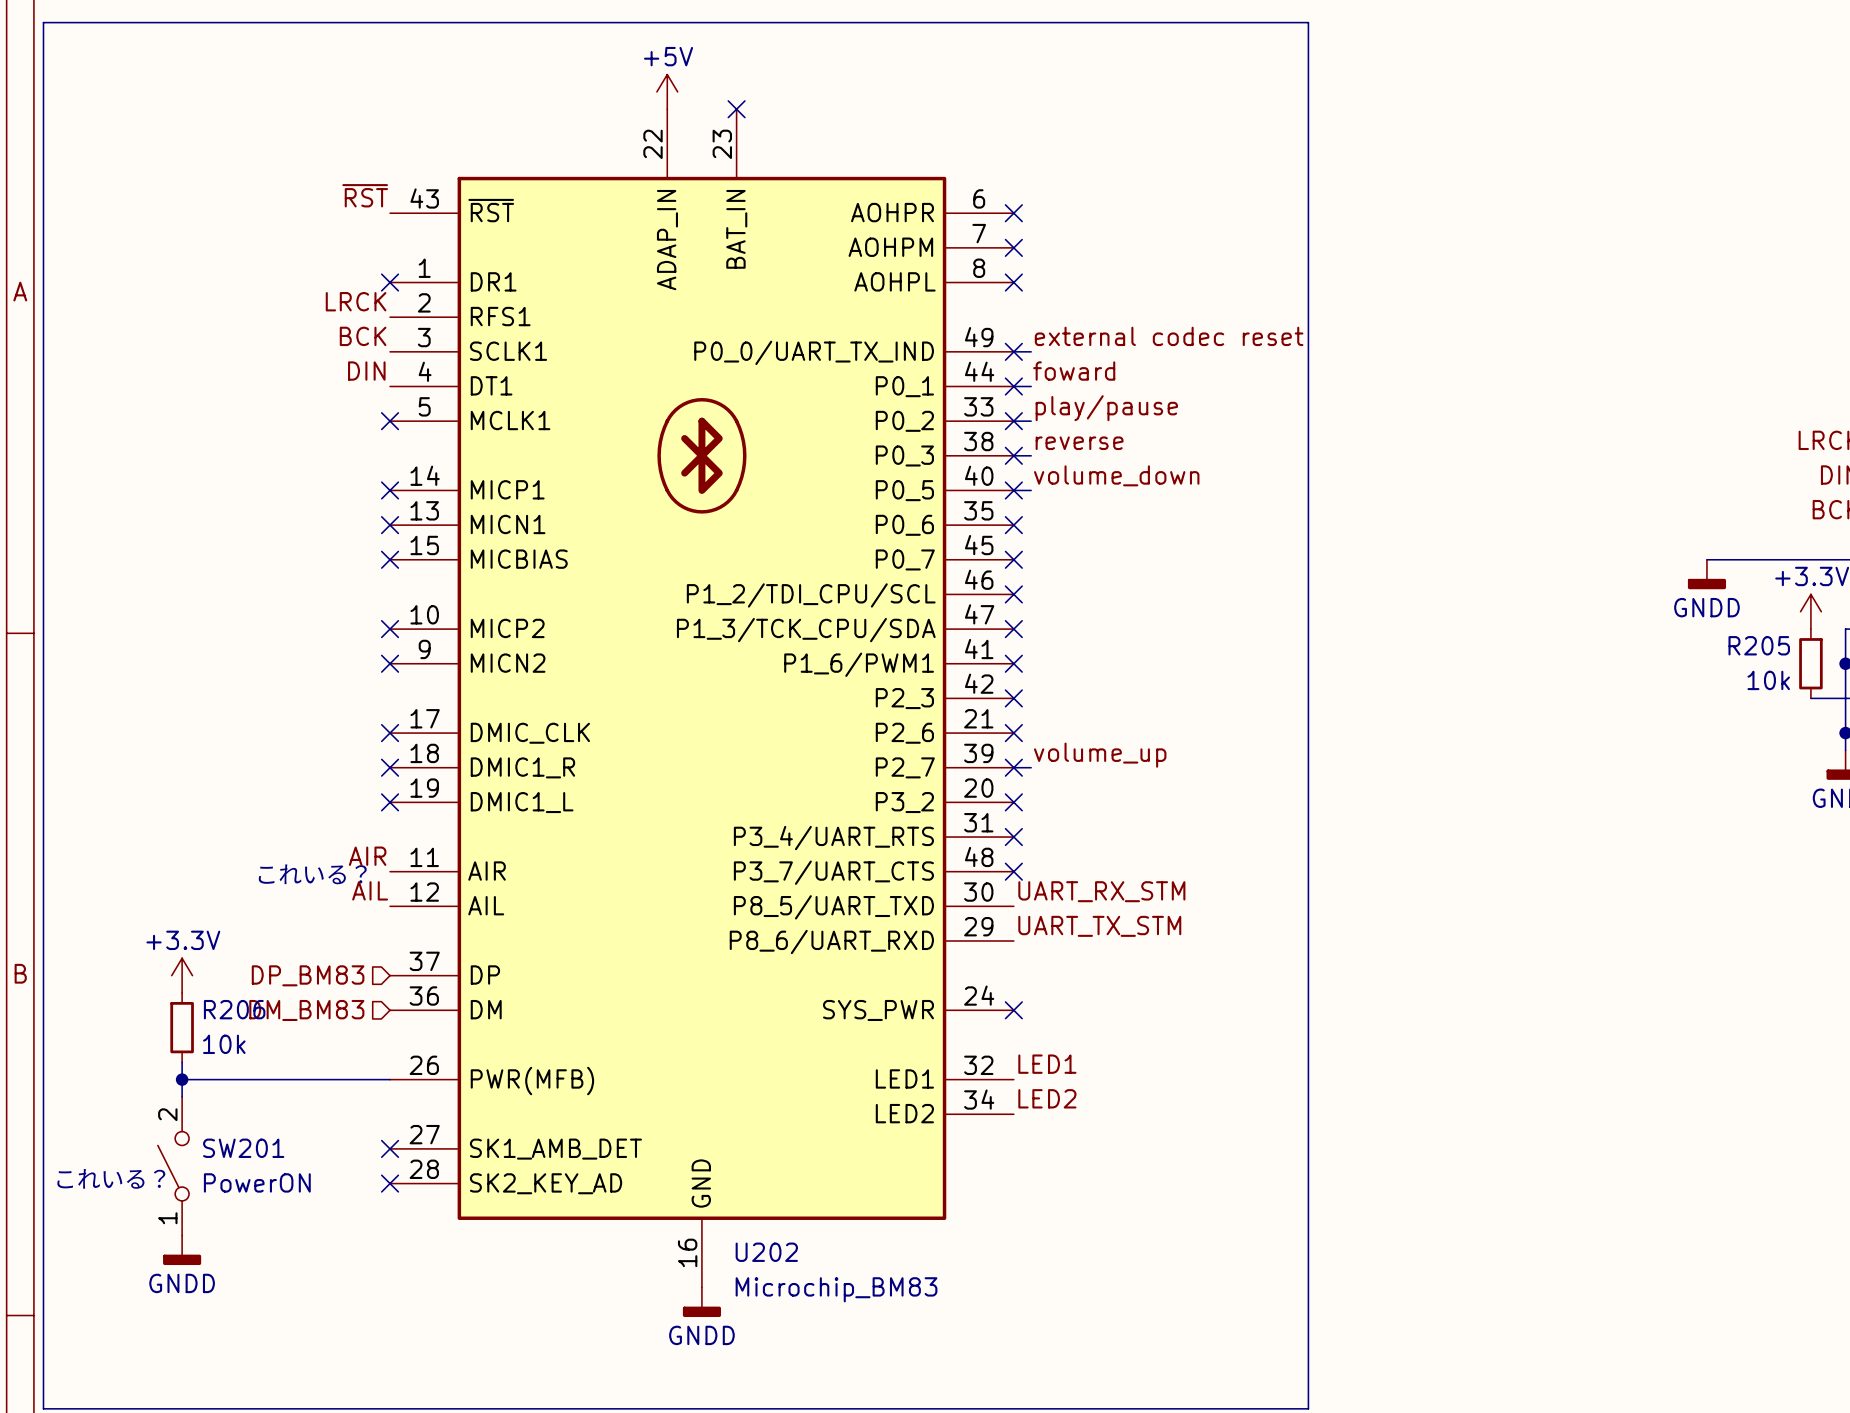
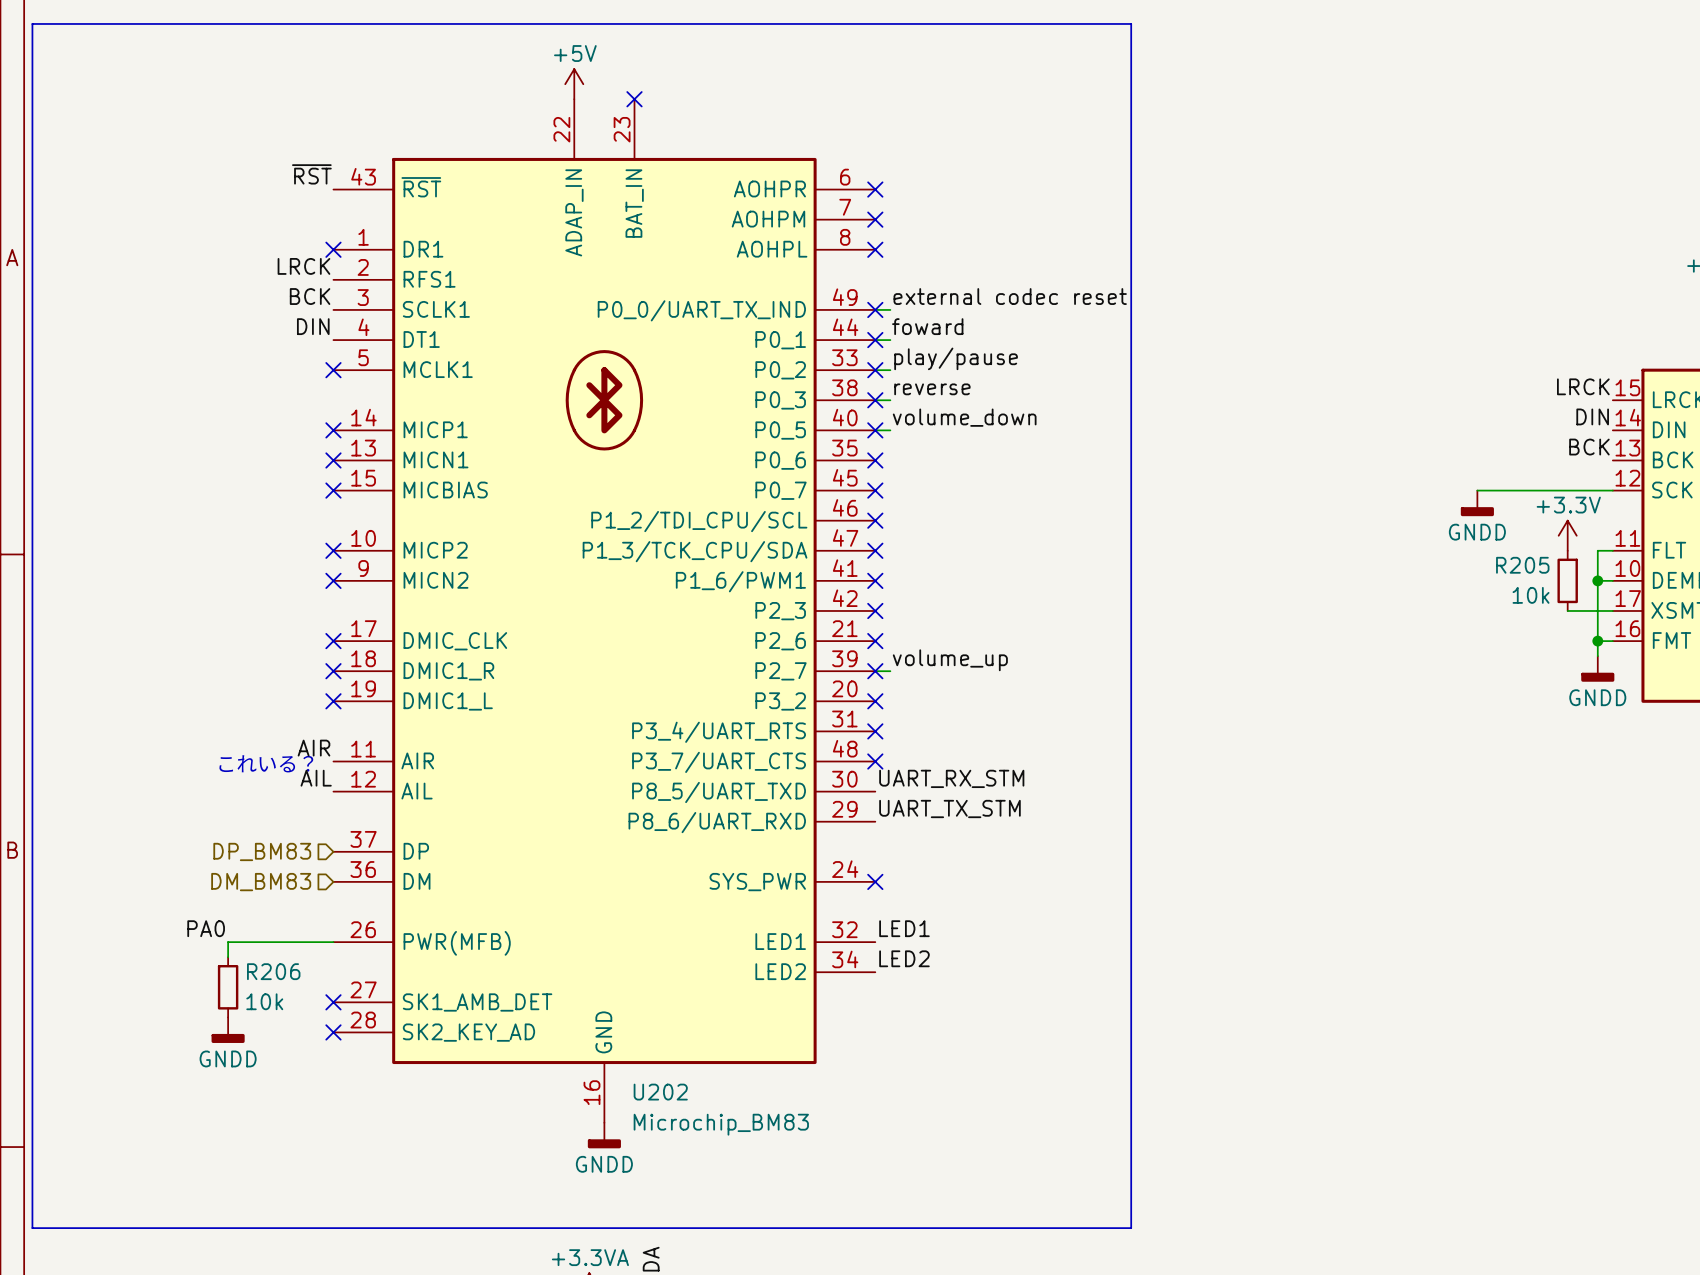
power symbol: +3.3V (182, 975) -> none
R206 position: (182, 1027) -> (228, 987)
wire: (182, 1062) (182, 1096) -> none
label: none -> PA0 (206, 928)
wire: (182, 1079) (268, 1079) -> (228, 957) (228, 942)
junction: (182, 1079) -> none
SW201: PowerON (173, 1166) -> none
text: これいる？ (111, 1178) -> none
power symbol position: GNDD (182, 1250) -> GNDD (228, 1030)

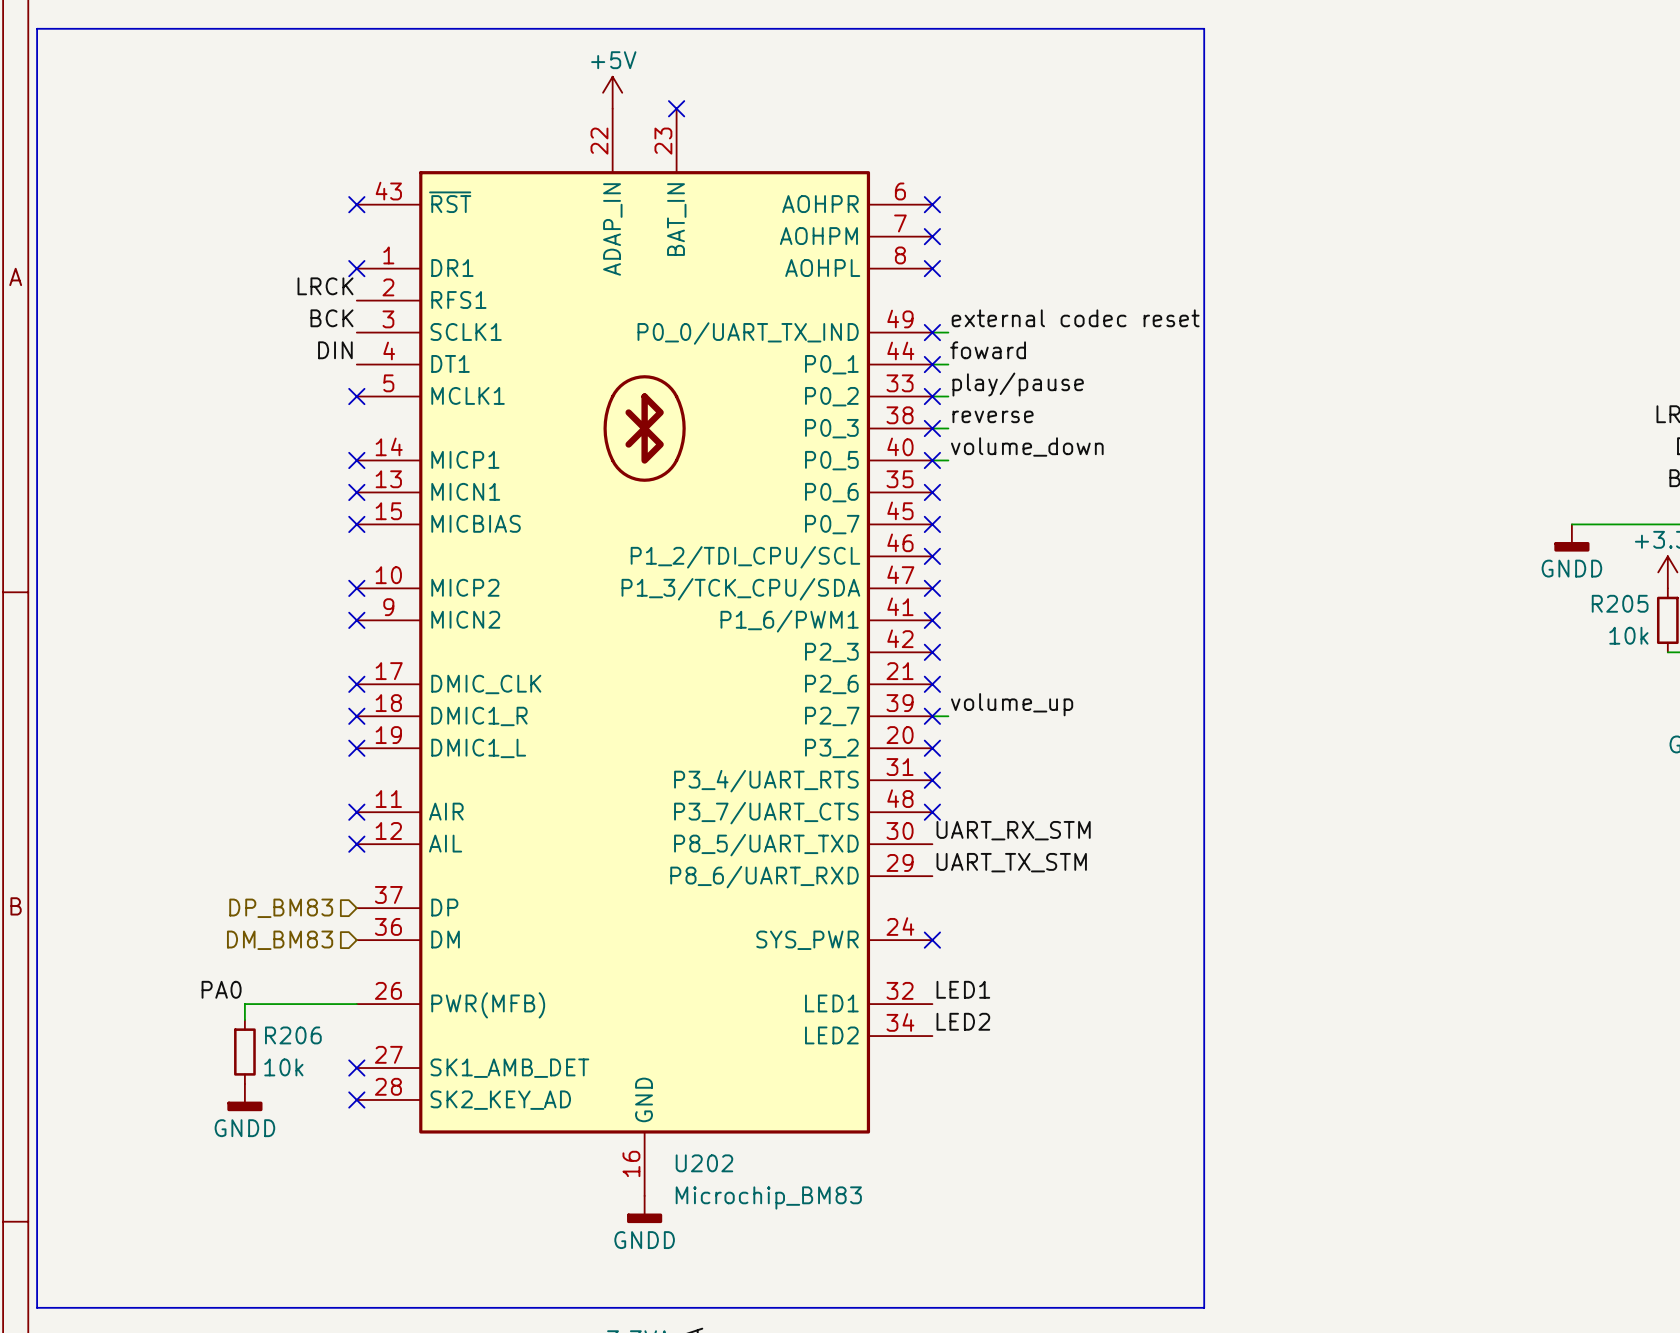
label: ~{RST} (311, 174) -> none
no-connect mark: none -> (356, 204)
label: AIR (314, 748) -> none
no-connect mark: none -> (356, 812)
text: これいる？ (266, 763) -> none
label: AIL (316, 778) -> none
no-connect mark: none -> (356, 844)

